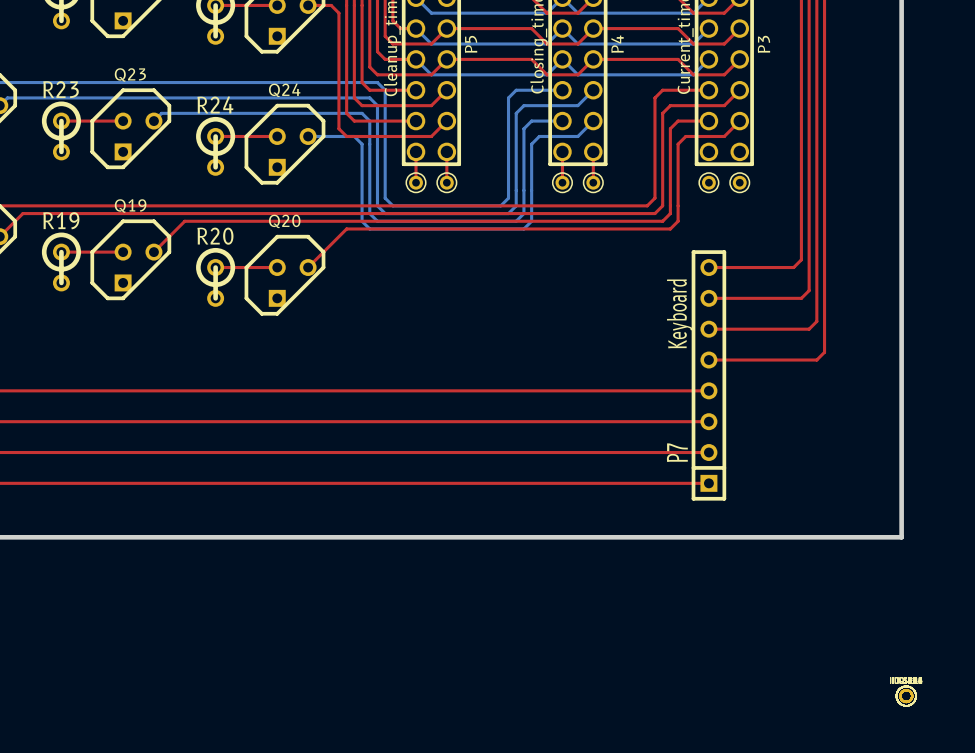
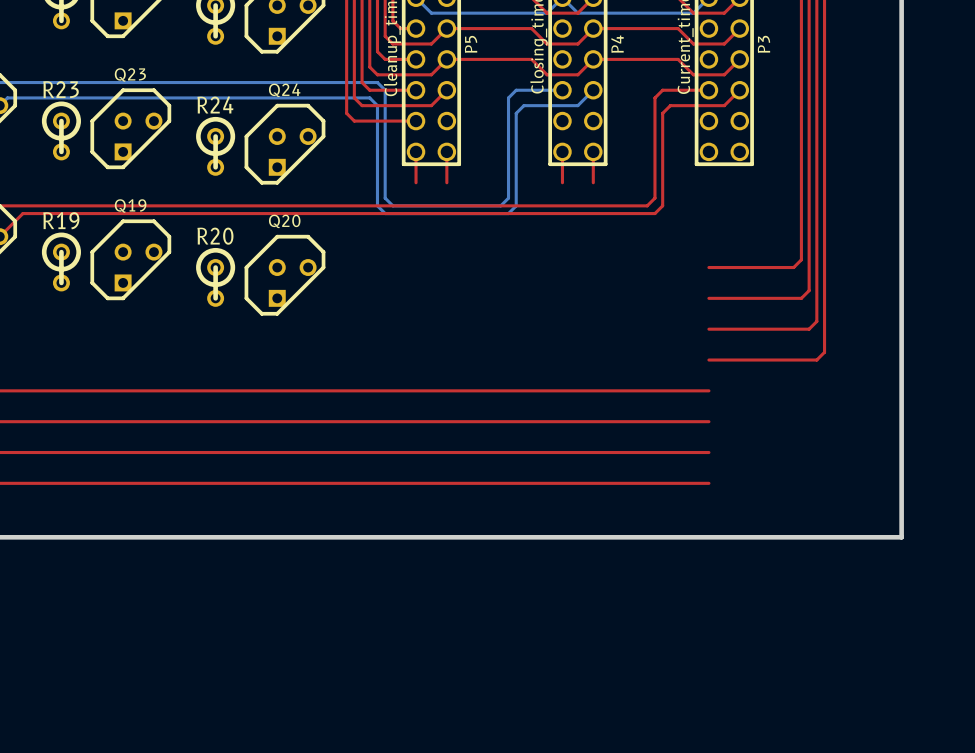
top track: (215, 5) (277, 5) -> none
top track: (308, 5) (331, 5) (338, 13) (338, 128) (346, 136) (431, 136) (446, 121) -> none
bottom track: (416, 28) (431, 43) (547, 43) (562, 28) (577, 43) (693, 43) (708, 28) -> none
bottom track: (416, 59) (431, 74) (547, 74) (562, 59) (577, 74) (693, 74) (708, 59) -> none
top track: (61, 121) (123, 121) -> none
bottom track: (153, 121) (161, 113) (362, 113) (369, 121) (369, 213) (377, 221) (516, 221) (523, 213) (523, 128) (531, 121) (562, 121) -> none
bottom track: (593, 121) (577, 136) (539, 136) (531, 144) (531, 221) (523, 228) (369, 228) (362, 221) (362, 144) (354, 136) (308, 136) -> none
top track: (708, 121) (678, 121) (670, 128) (670, 213) (662, 221) (184, 221) (153, 252) -> none
top track: (739, 121) (724, 136) (685, 136) (678, 144) (678, 221) (670, 228) (346, 228) (308, 267) -> none
top track: (215, 136) (277, 136) -> none
part: (416, 182) -> none
part: (446, 182) -> none
part: (562, 182) -> none
part: (593, 182) -> none
part: (708, 182) -> none
part: (739, 182) -> none
top track: (61, 252) (123, 252) -> none
top track: (215, 267) (277, 267) -> none
P7: Keyboard (708, 375) -> none
part: (906, 696) -> none
part: (906, 696) -> none
part: (906, 696) -> none
part: (906, 696) -> none
part: (906, 696) -> none
part: (906, 696) -> none
part: (906, 696) -> none
part: (906, 696) -> none
part: (906, 696) -> none
part: (906, 696) -> none
part: (906, 696) -> none
part: (906, 696) -> none

